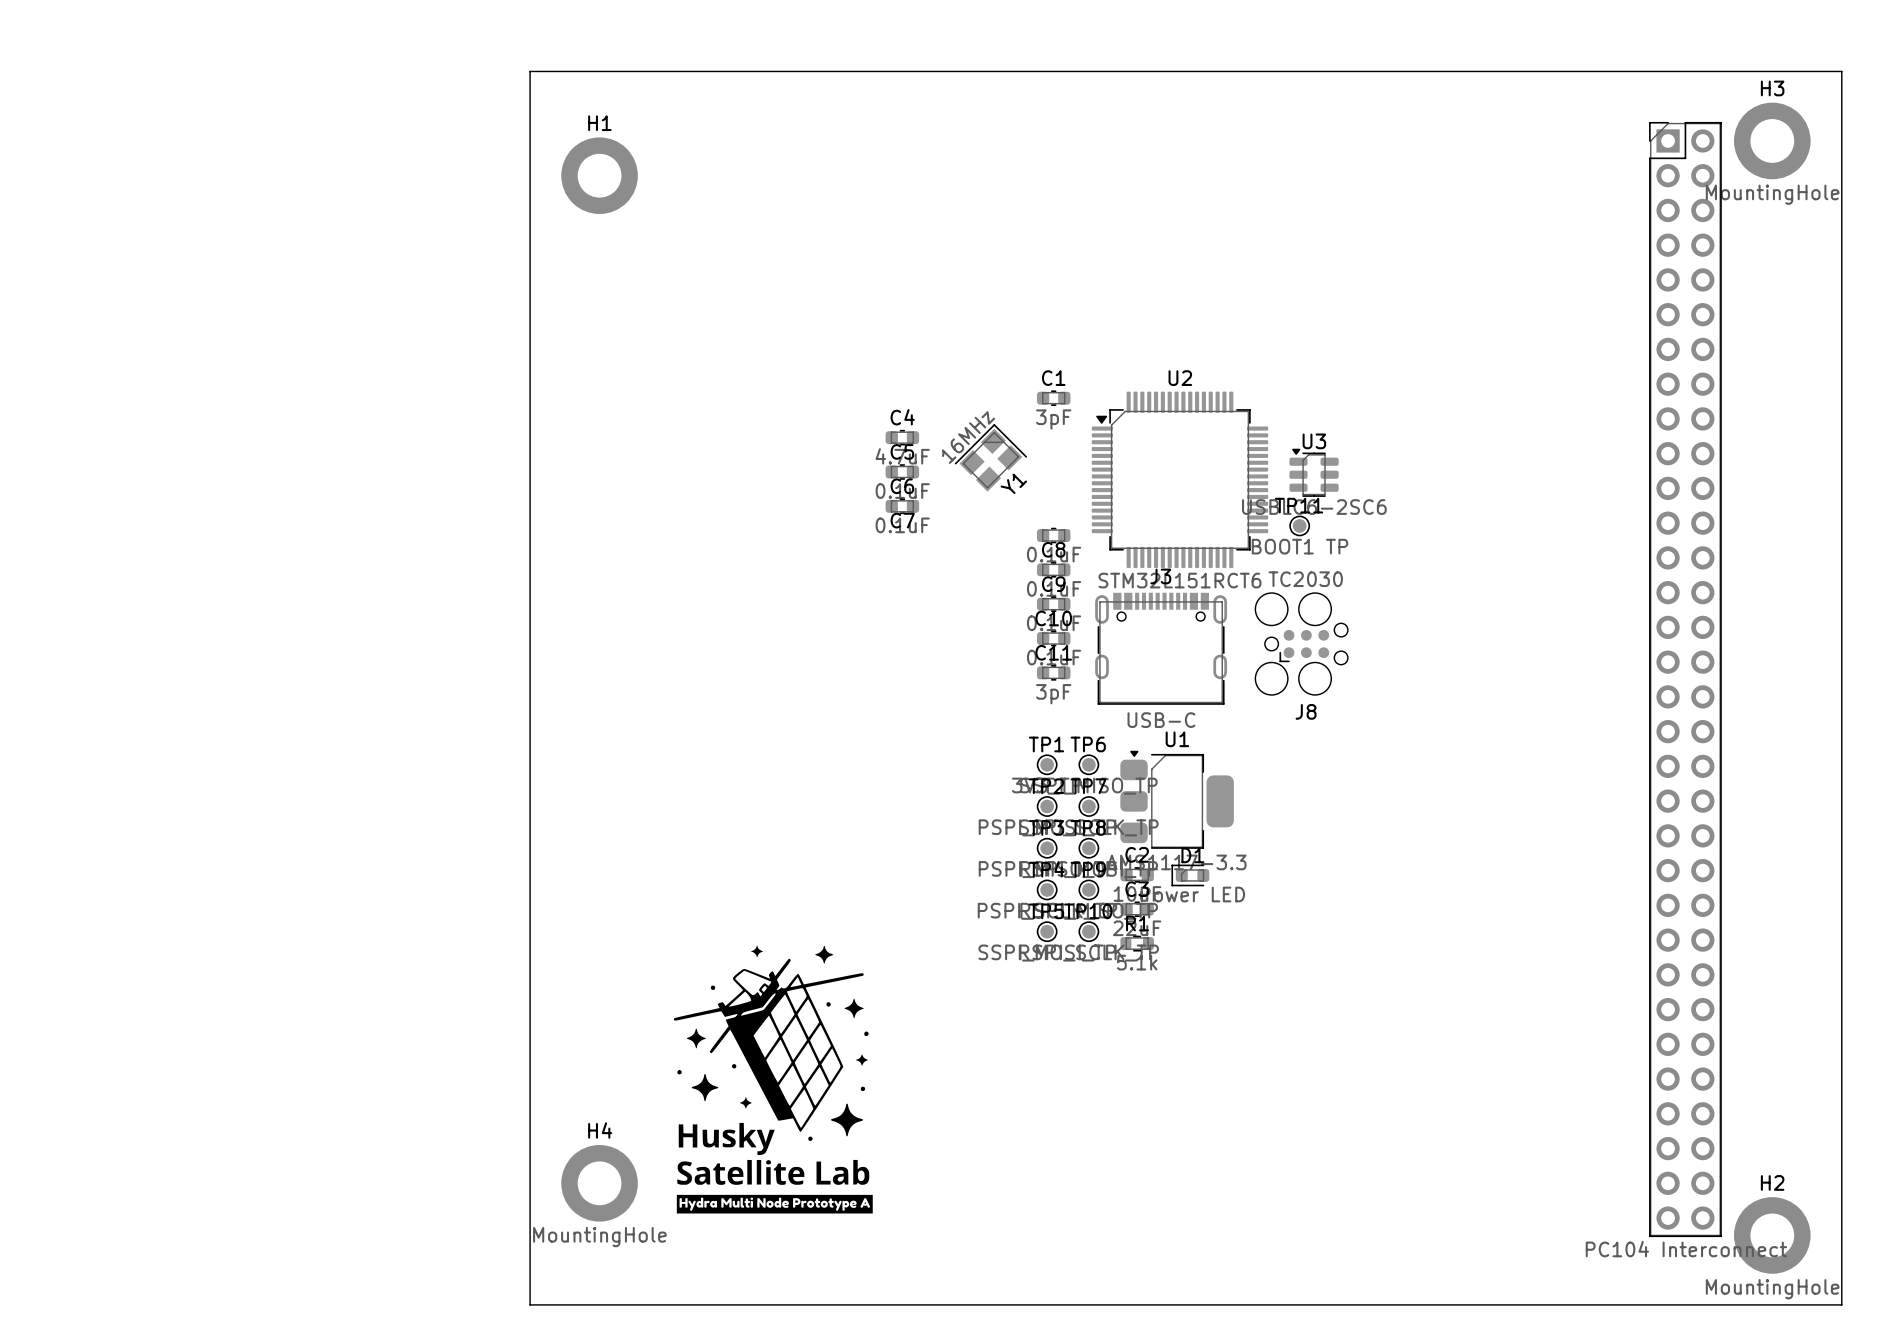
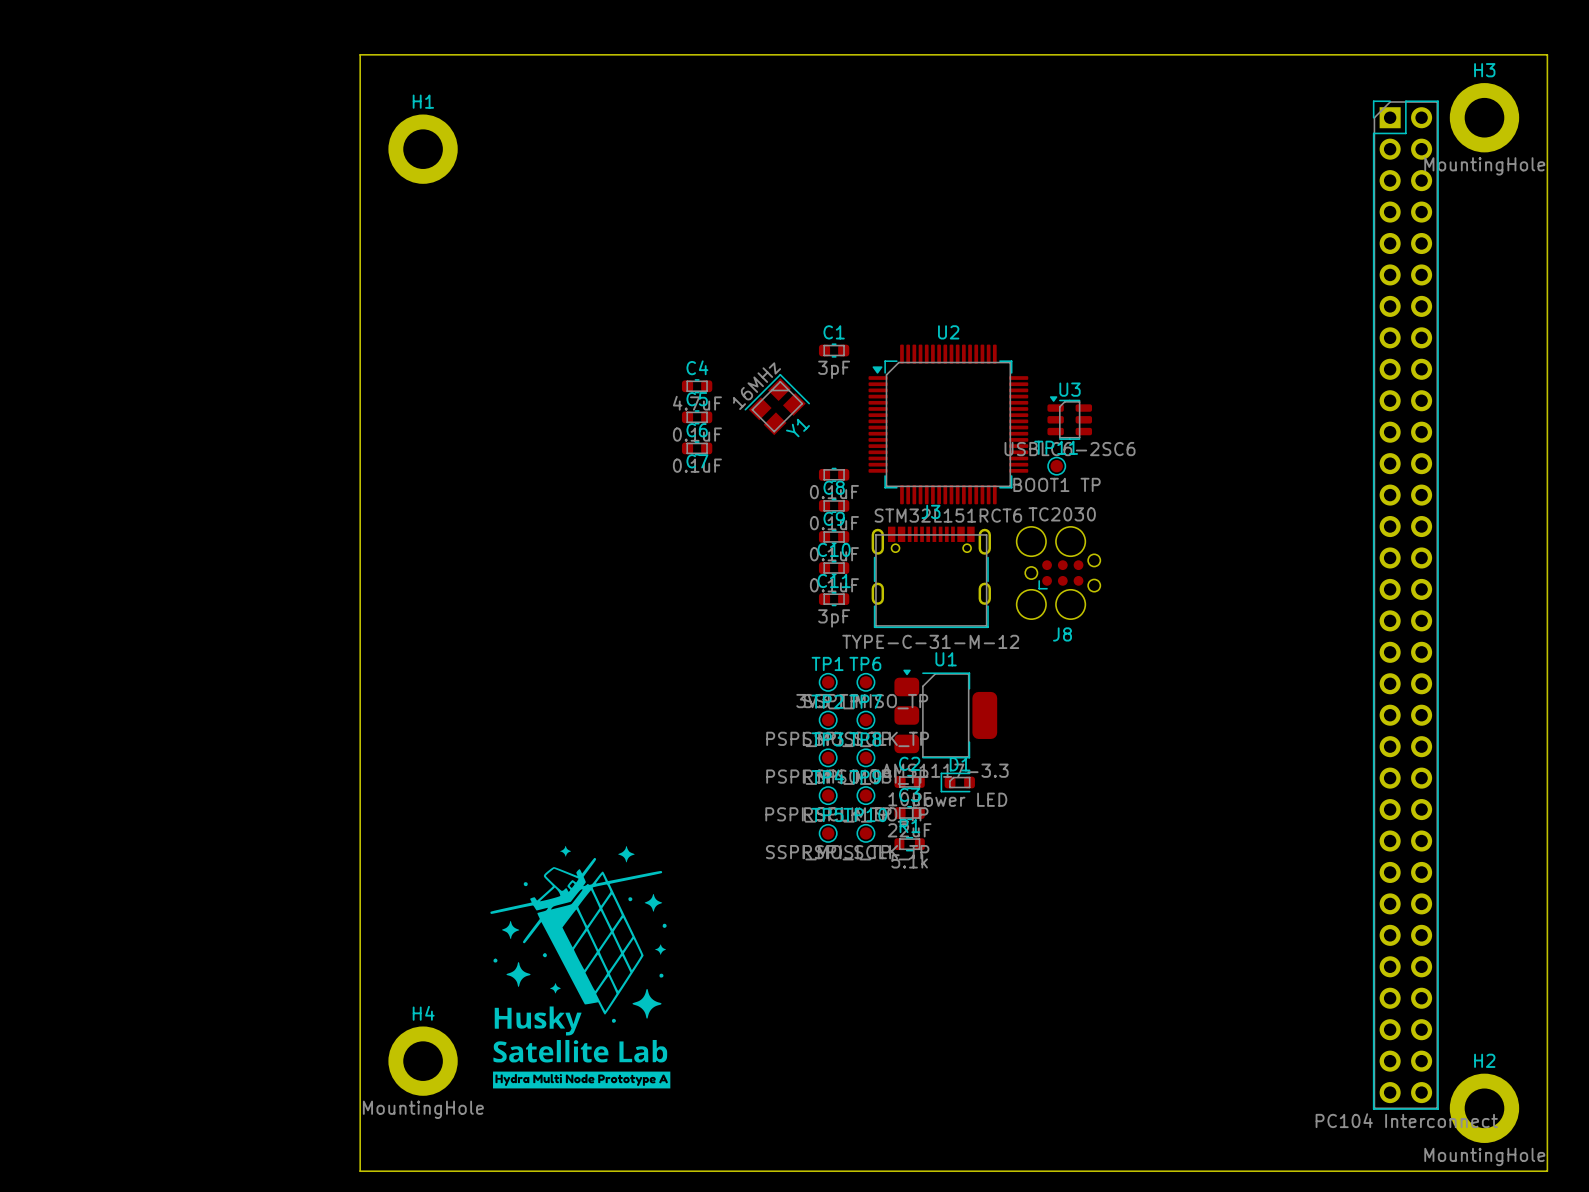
J3 value: USB-C (1161, 720) -> TYPE-C-31-M-12 (930, 641)

